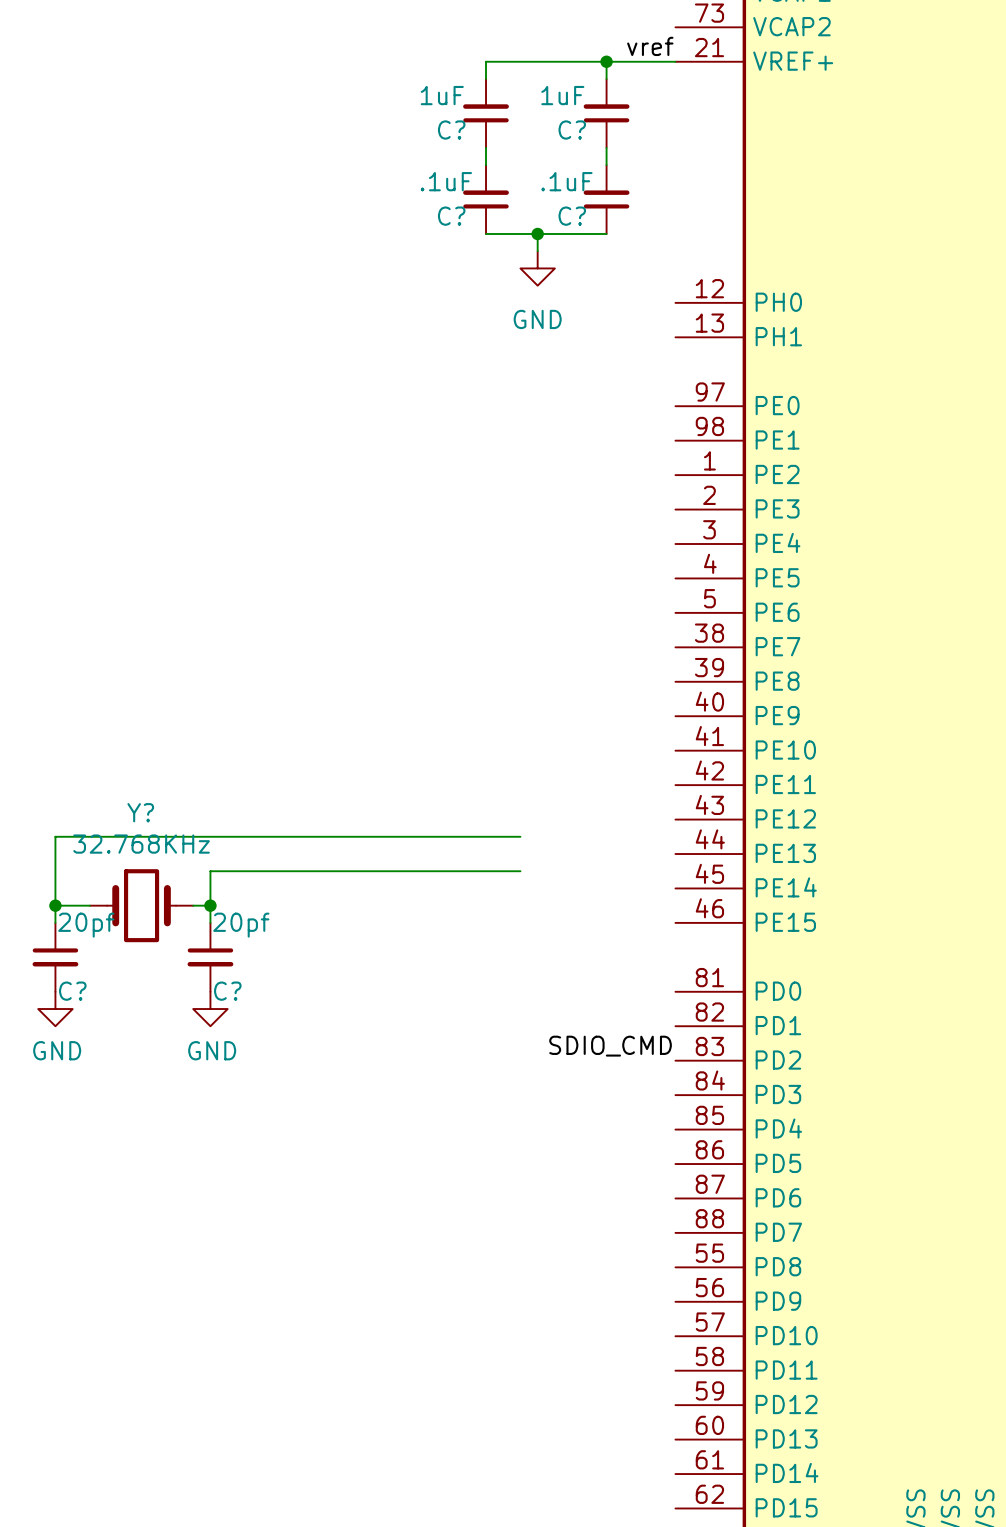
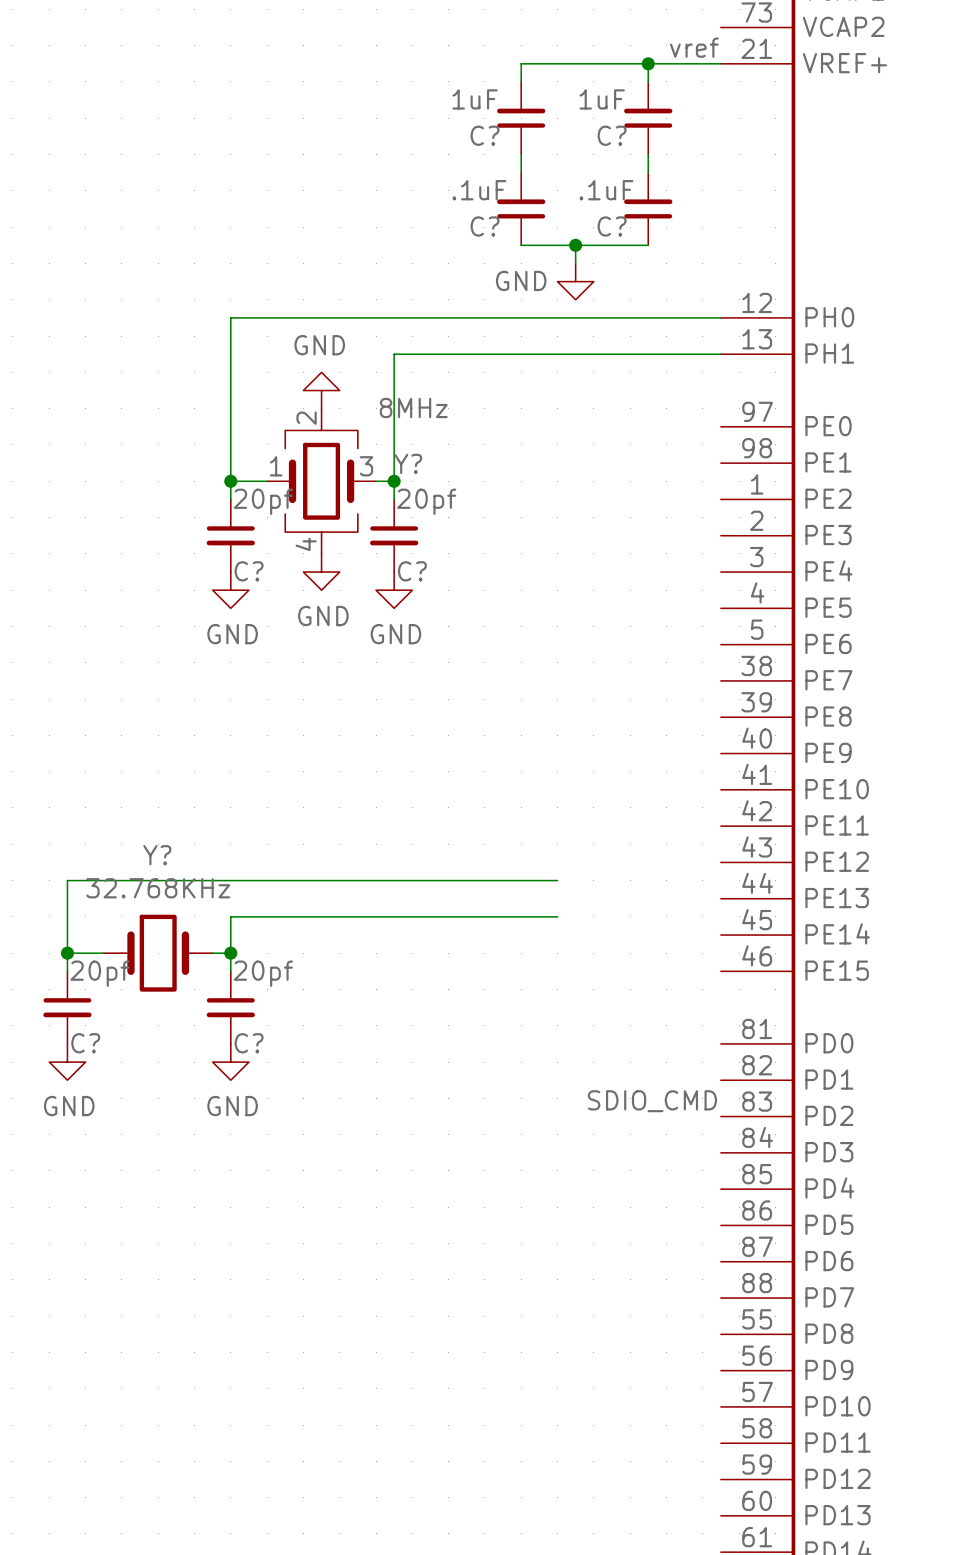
wire: none -> (720, 317) (230, 317) (230, 499)
power symbol text position: GND (537, 319) -> GND (521, 280)
wire: none -> (720, 354) (394, 354) (394, 499)
power symbol: none -> GND (321, 390)
wire: none -> (230, 481) (267, 481)
junction: none -> (230, 481)
Y?: none -> 8MHz (321, 481)
wire: none -> (376, 481) (394, 481)
junction: none -> (394, 481)
C?: none -> 20pf (230, 535)
C?: none -> 20pf (394, 535)
power symbol: none -> GND (321, 572)
power symbol: none -> GND (230, 590)
power symbol: none -> GND (394, 590)

